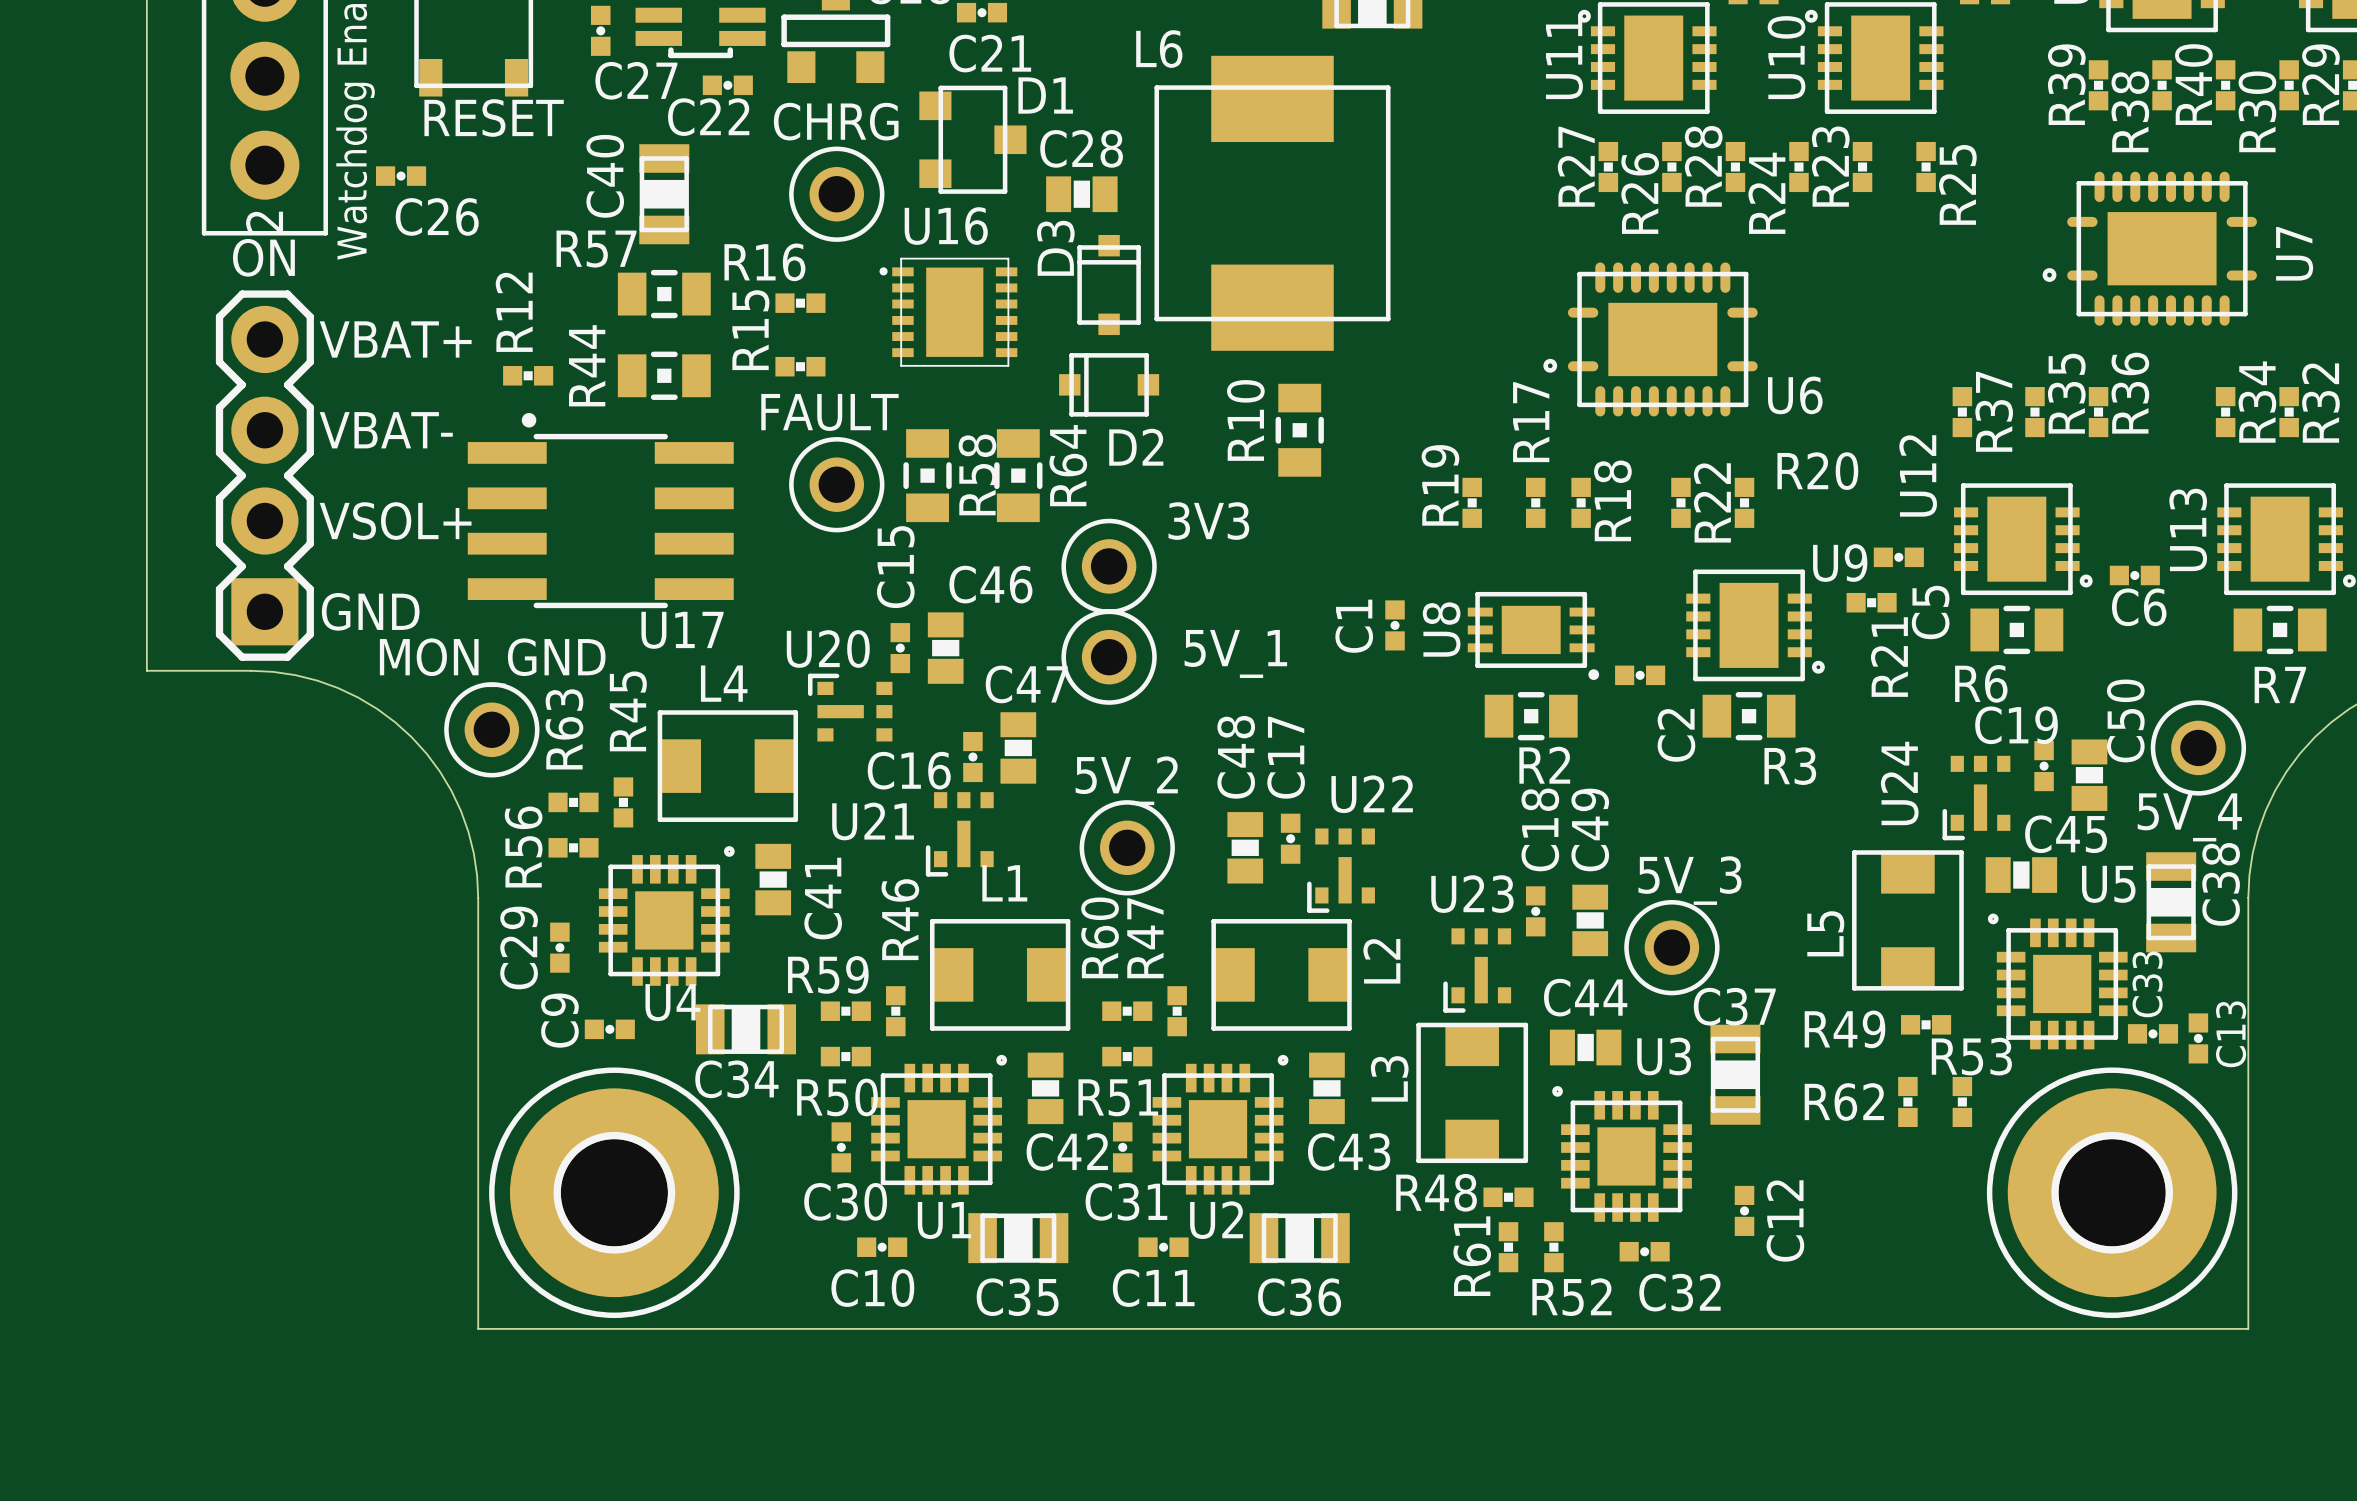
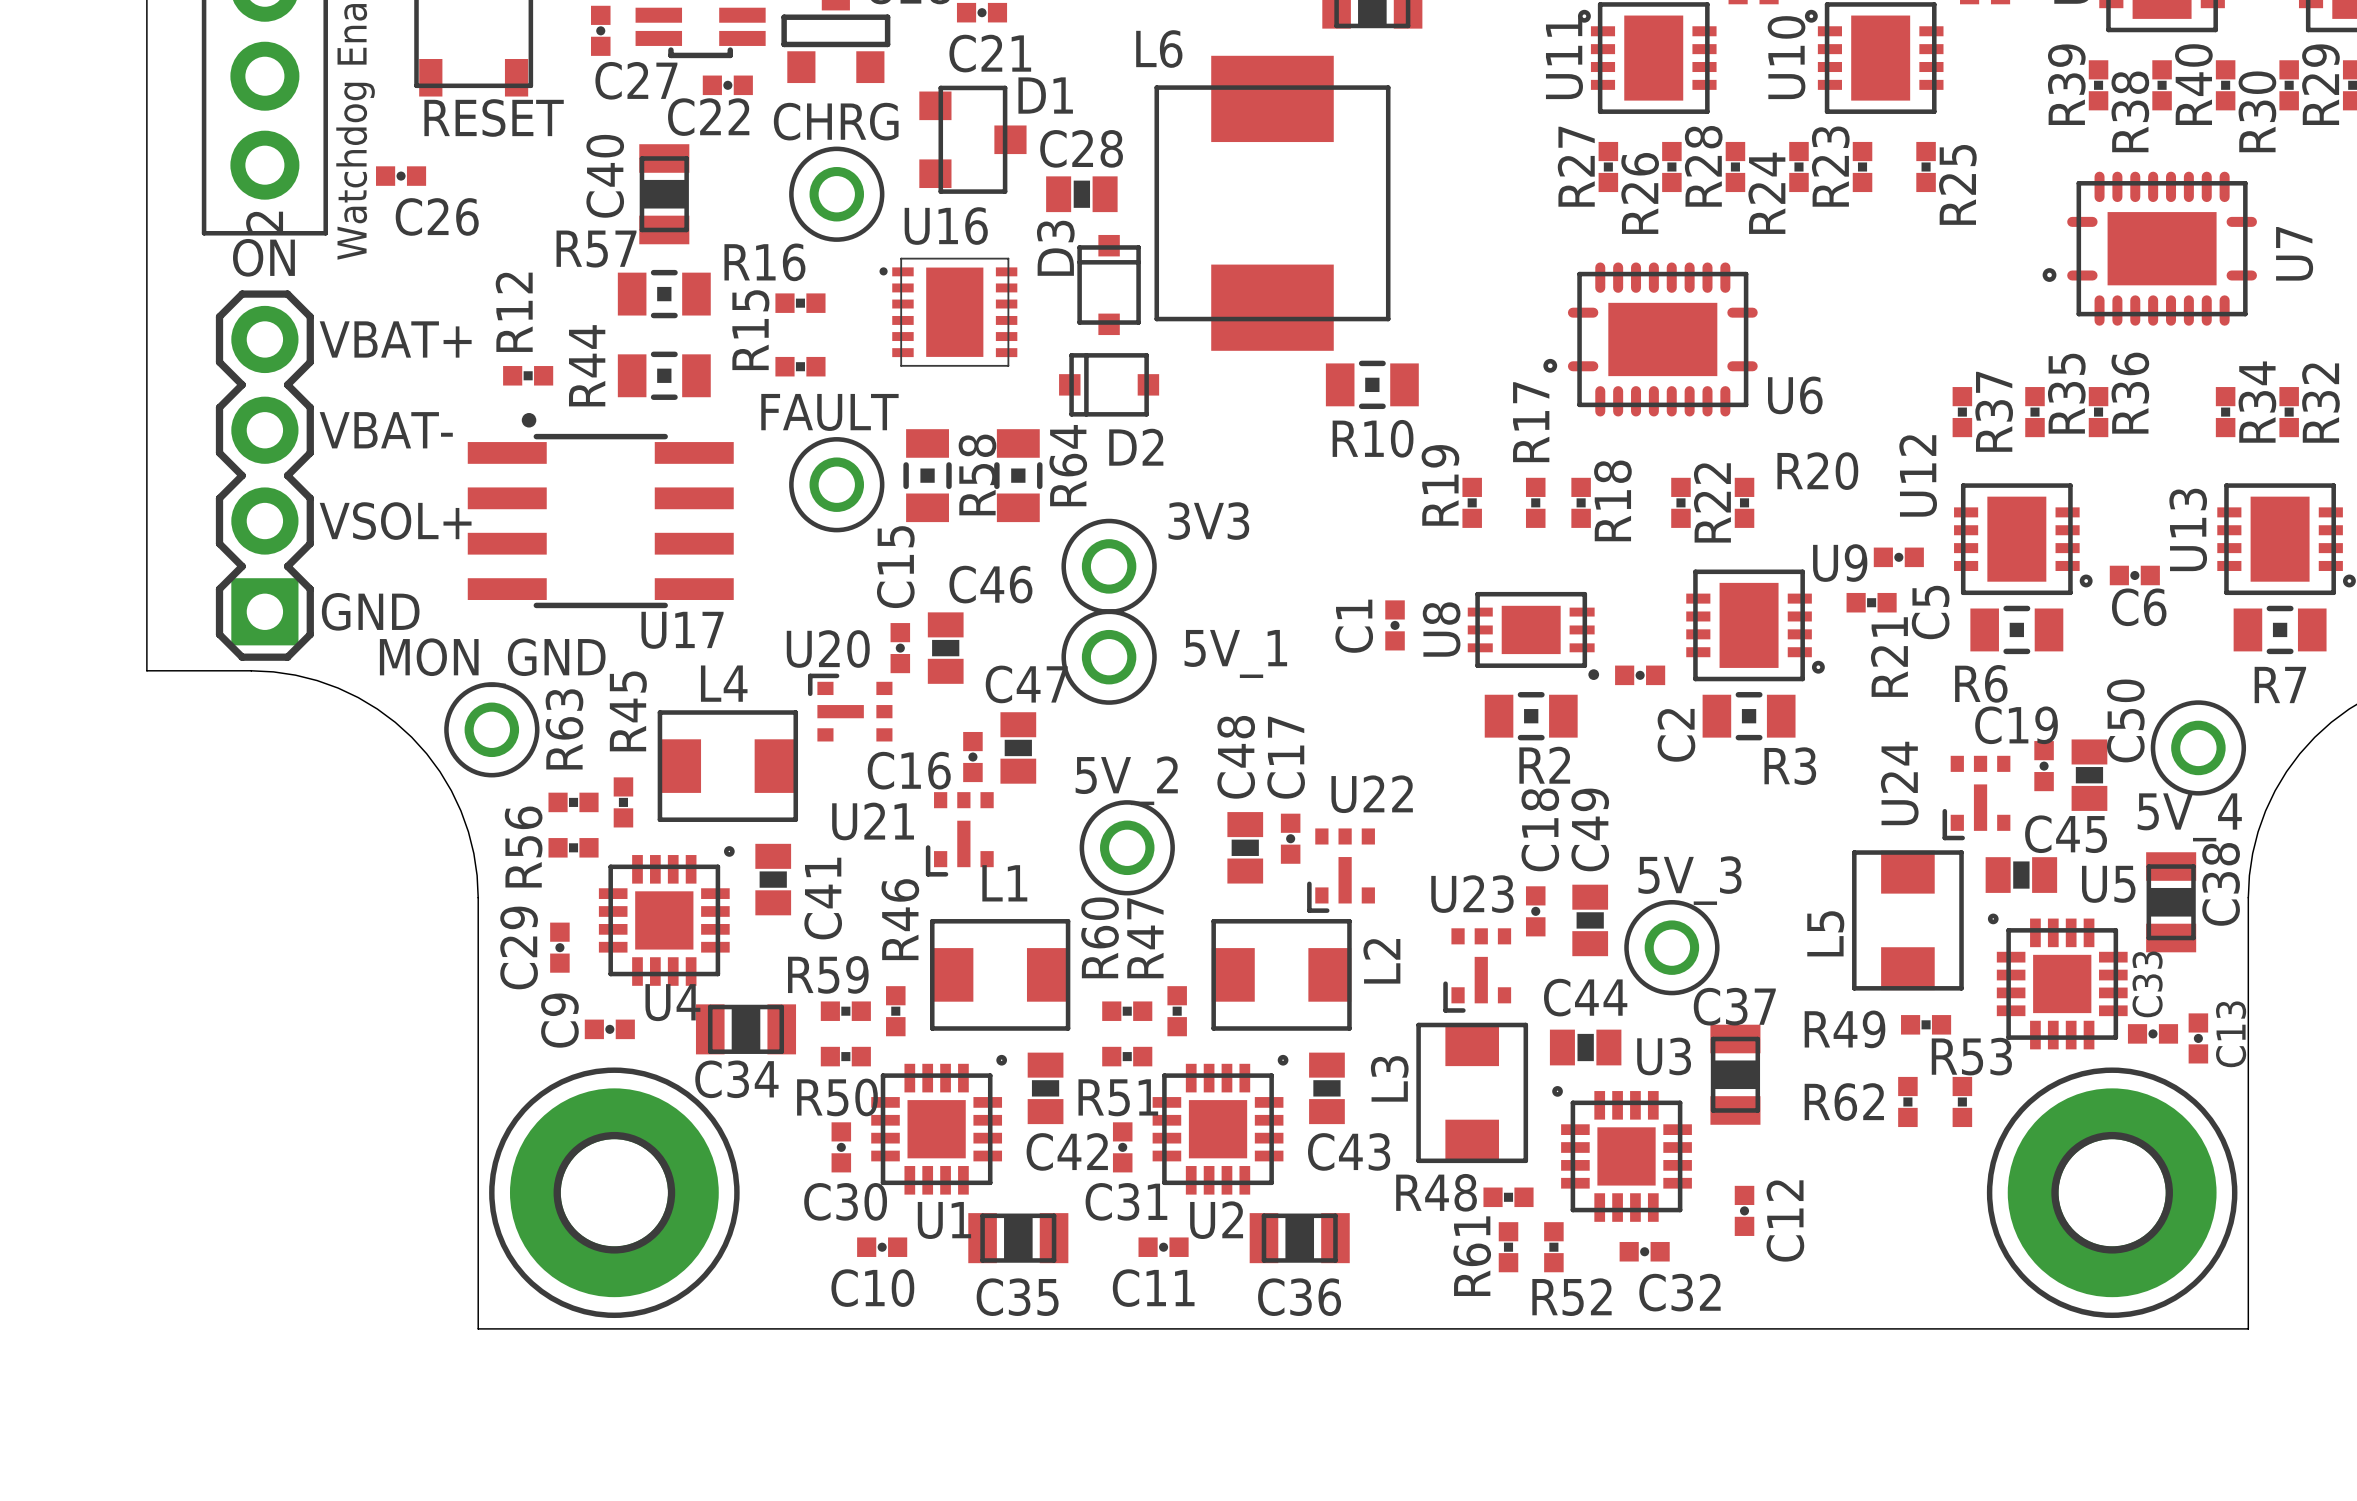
R10 name position: R10 (1245, 420) -> R10 (1373, 438)
R10 rotation: 0° (1299, 430) -> 90° clockwise (1372, 384)
R10 position: (1299, 430) -> (1372, 384)

